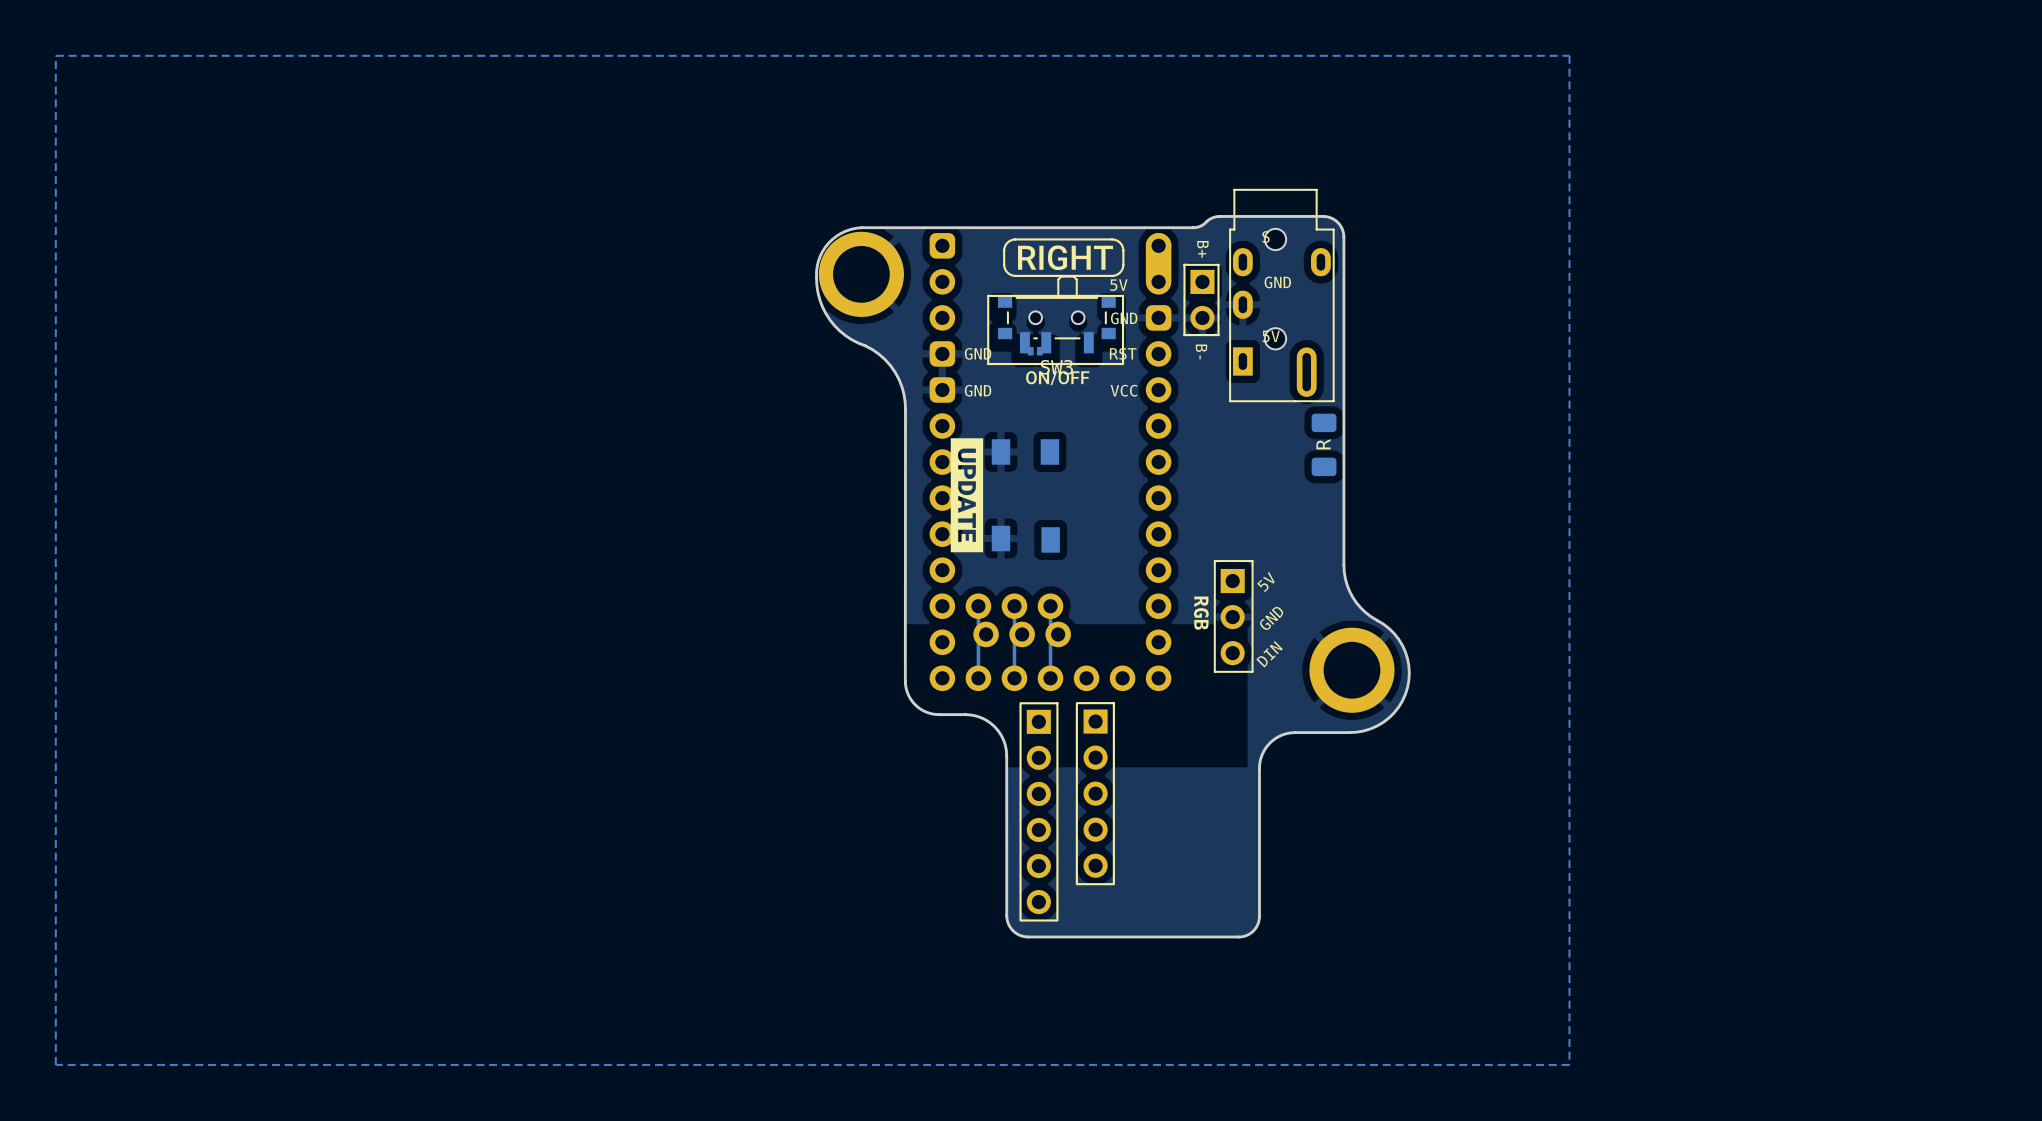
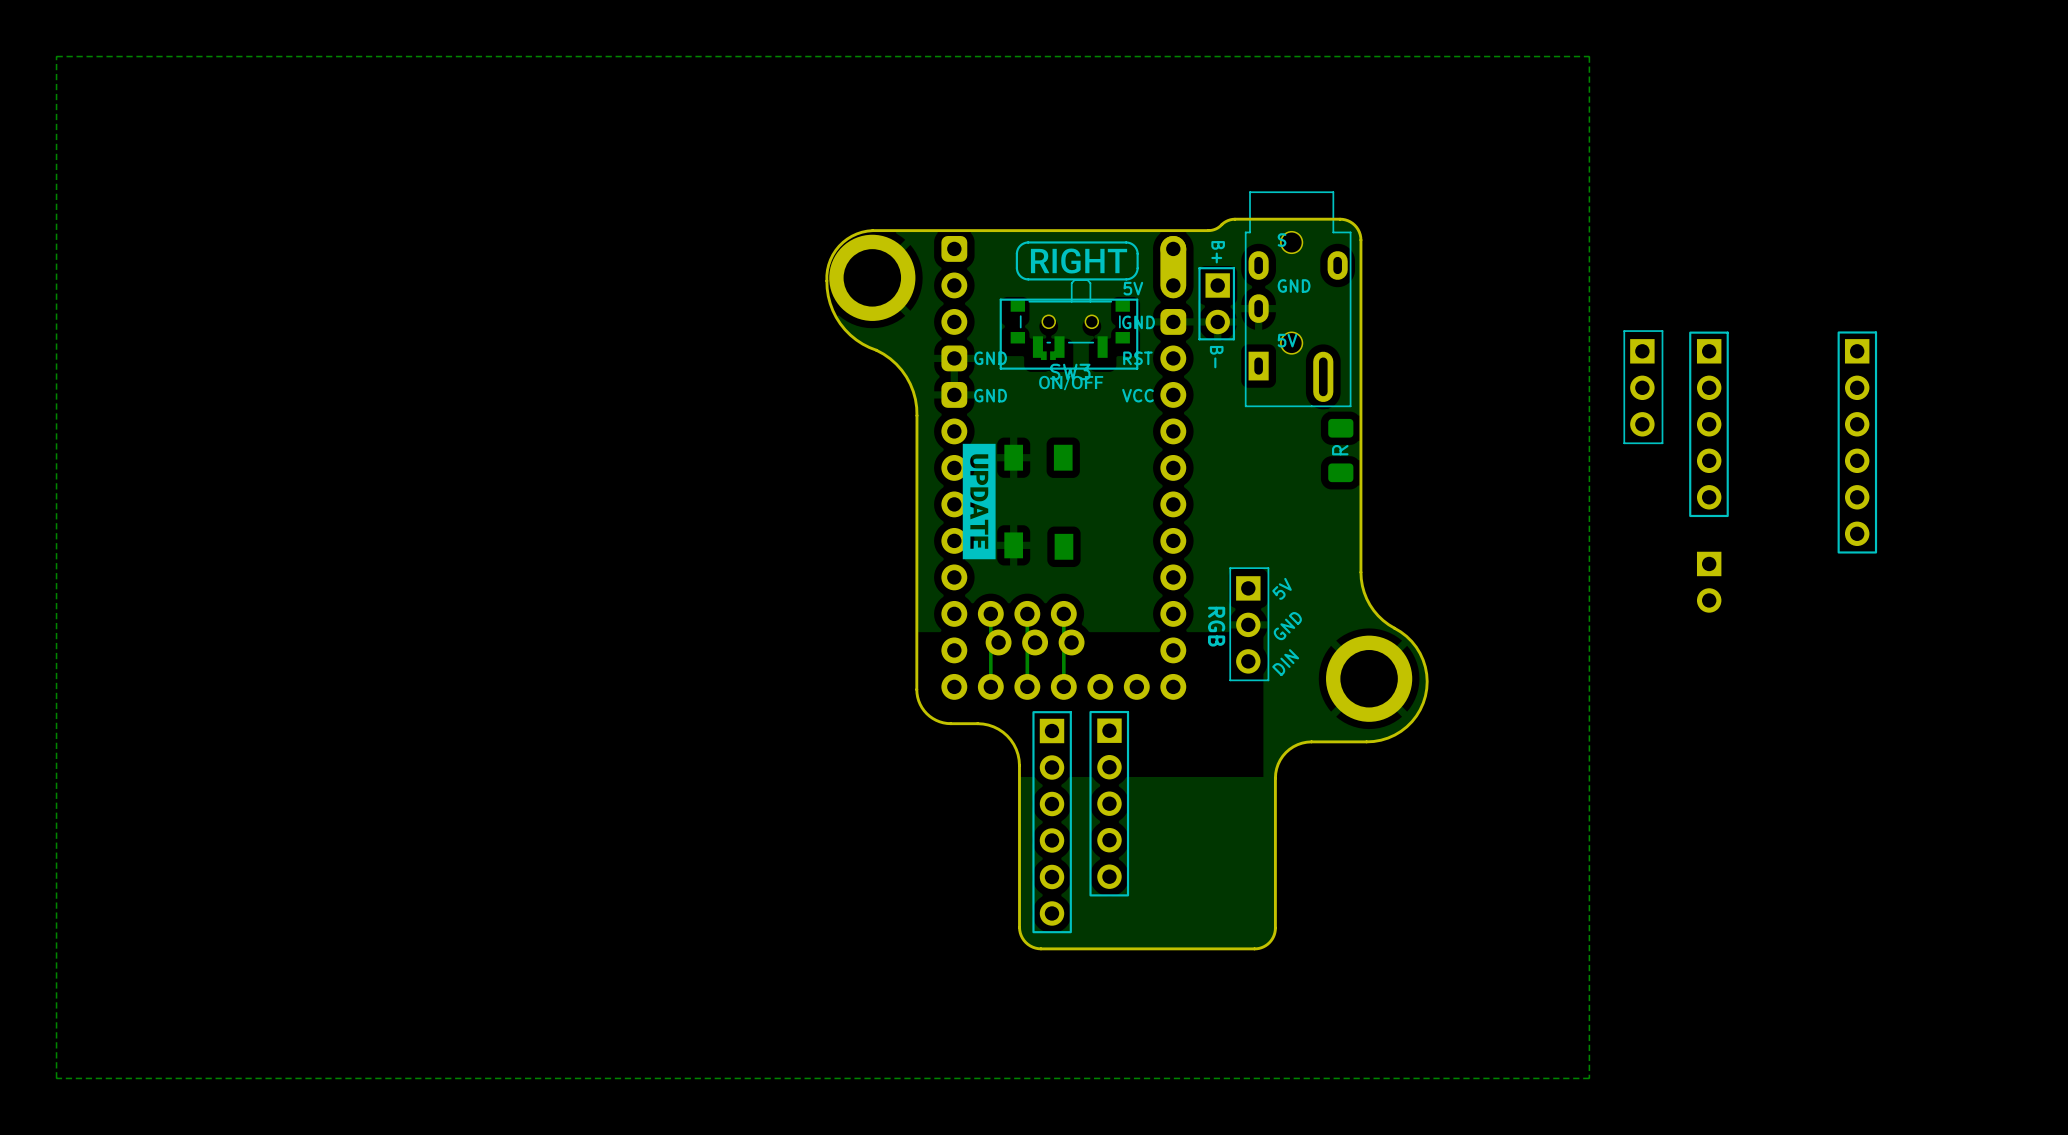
part: none -> (1643, 387)
part: none -> (1708, 424)
part: none -> (1857, 442)
part: none -> (1709, 582)

